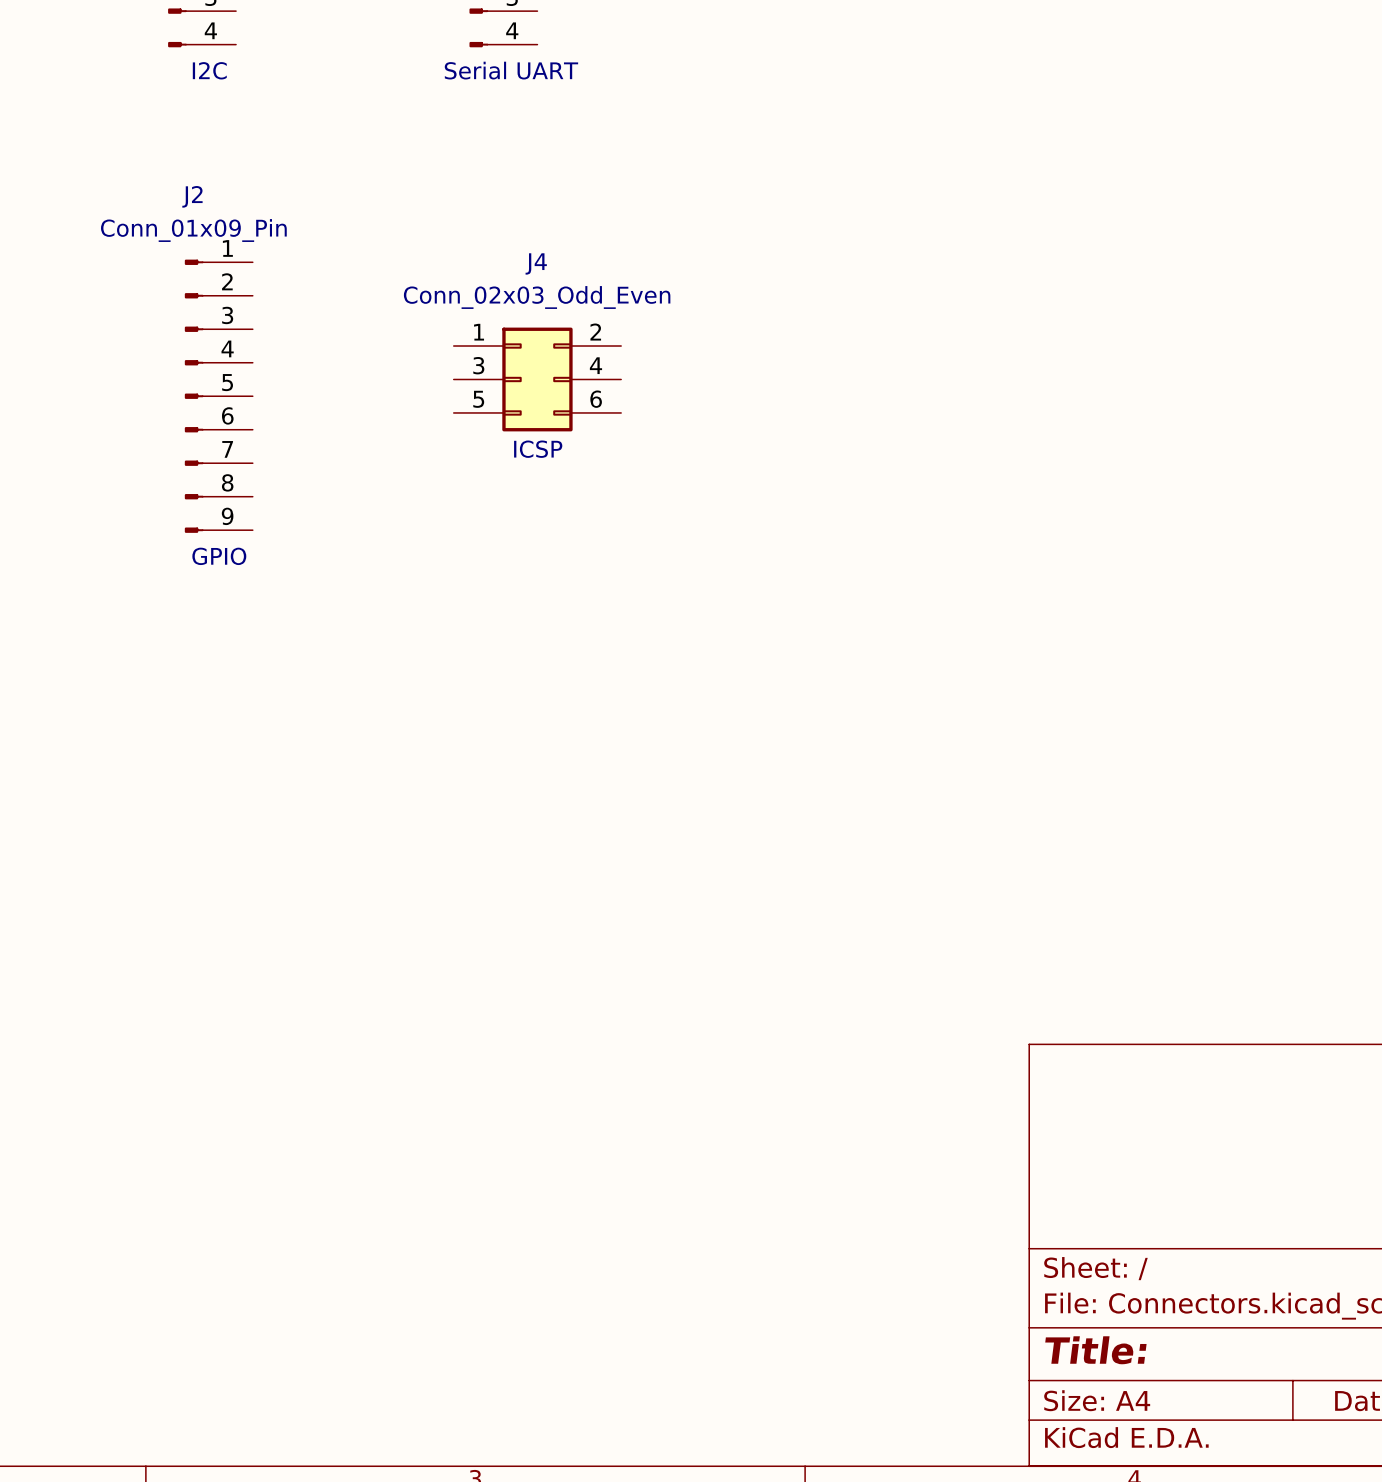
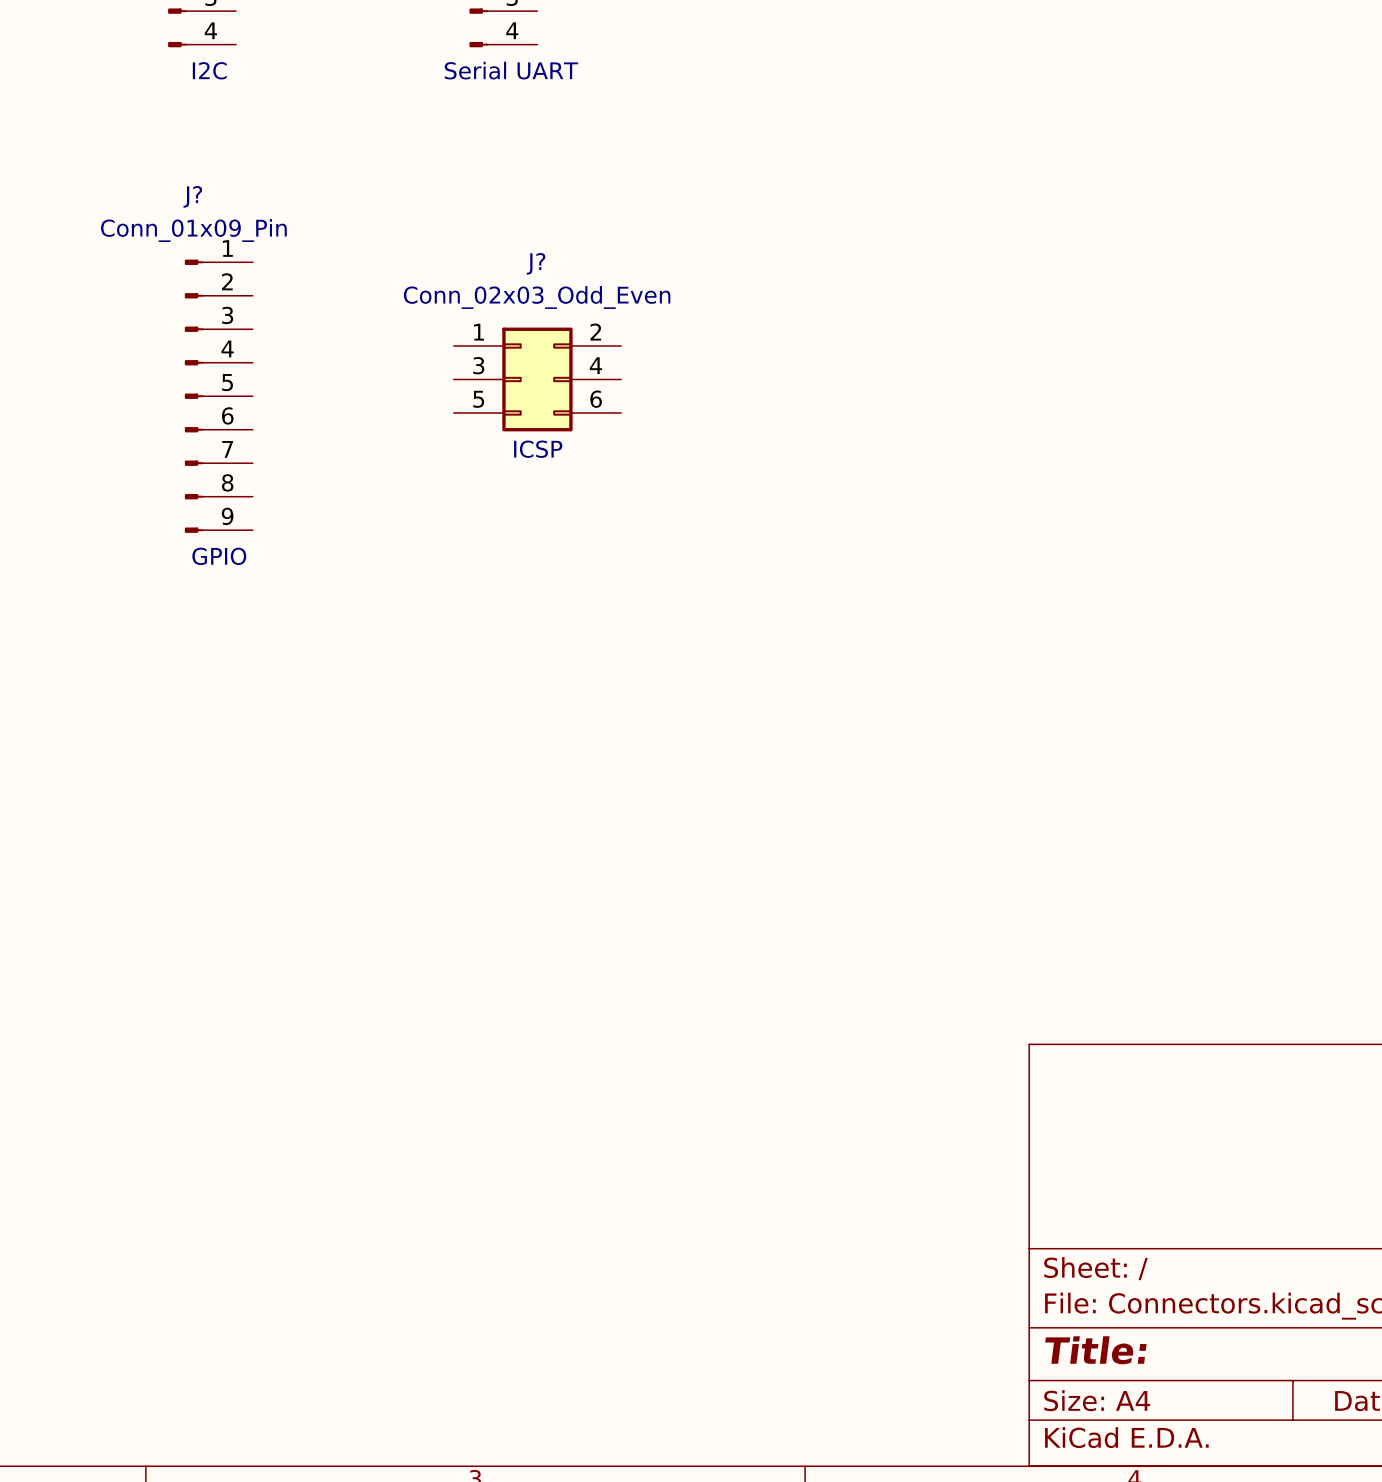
J2 name: J2 (192, 196) -> J? (192, 196)
J4 name: J4 (536, 263) -> J? (536, 263)

